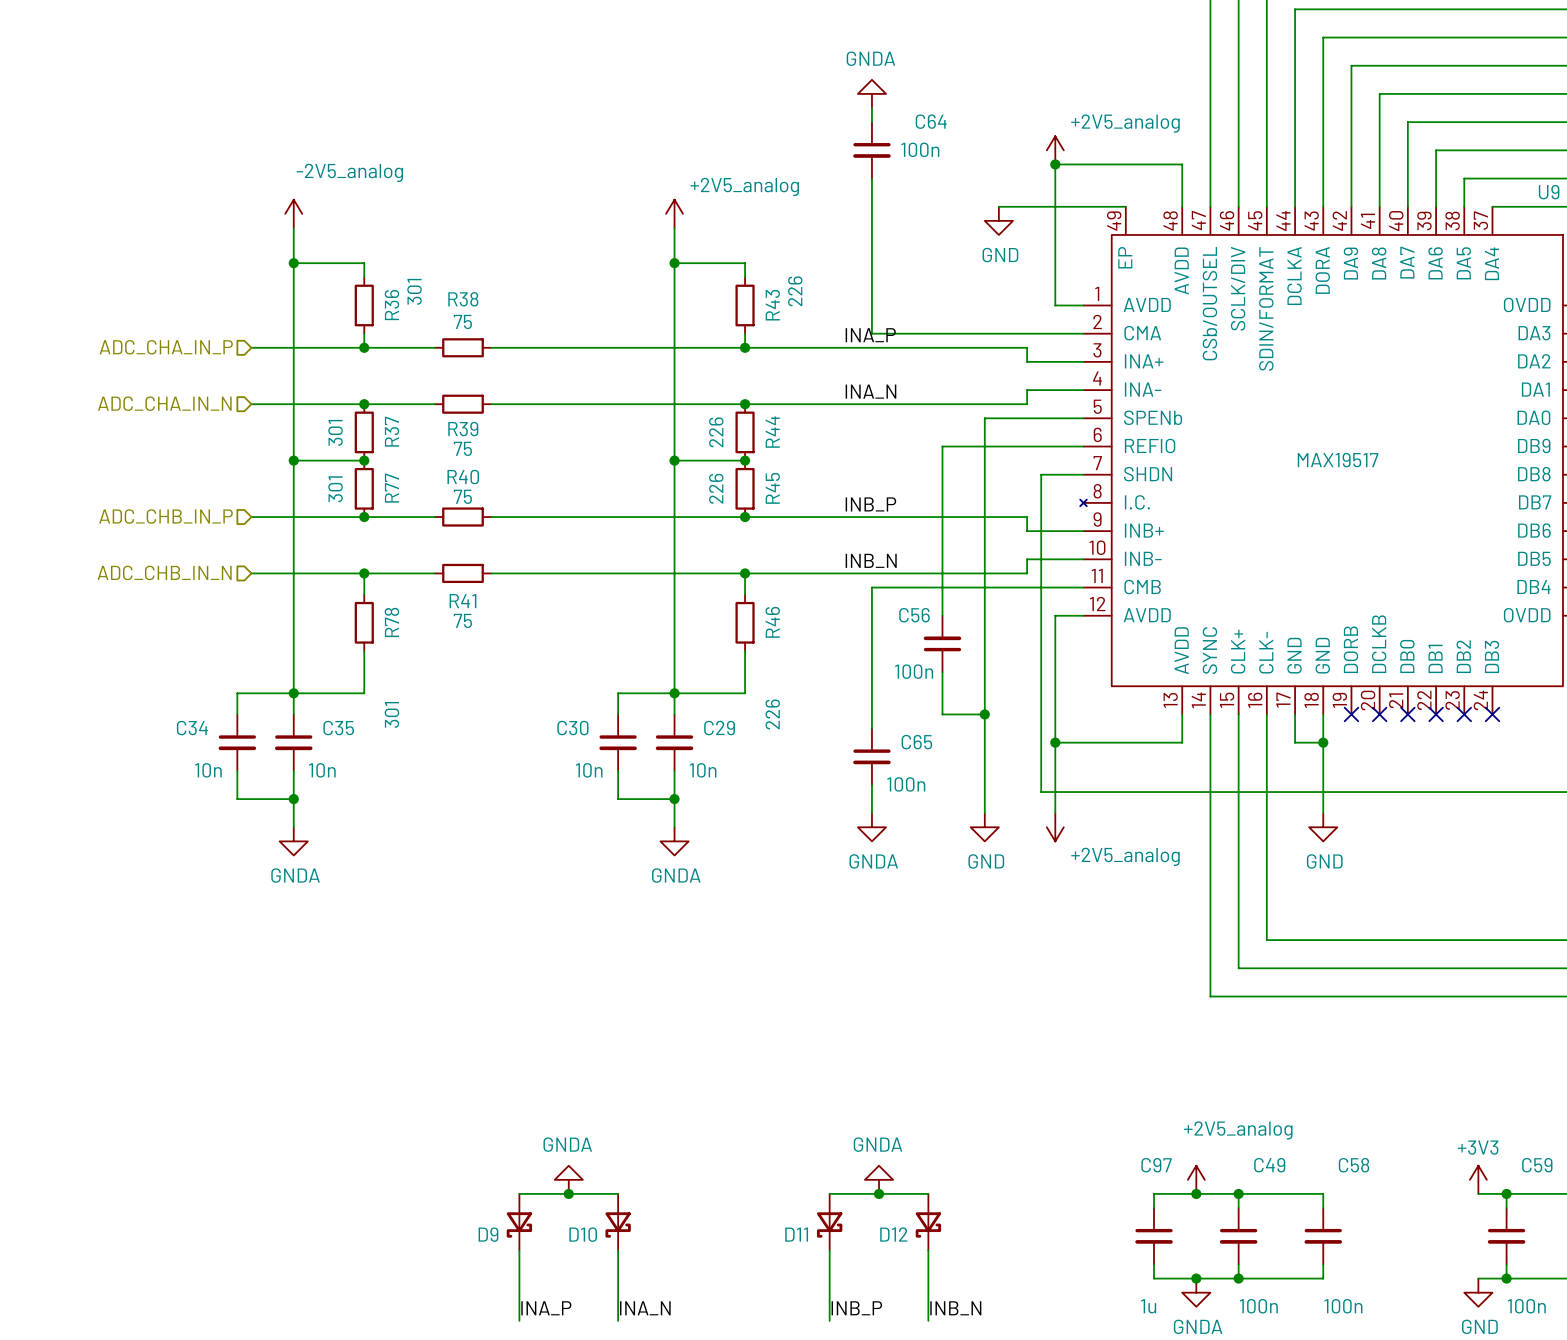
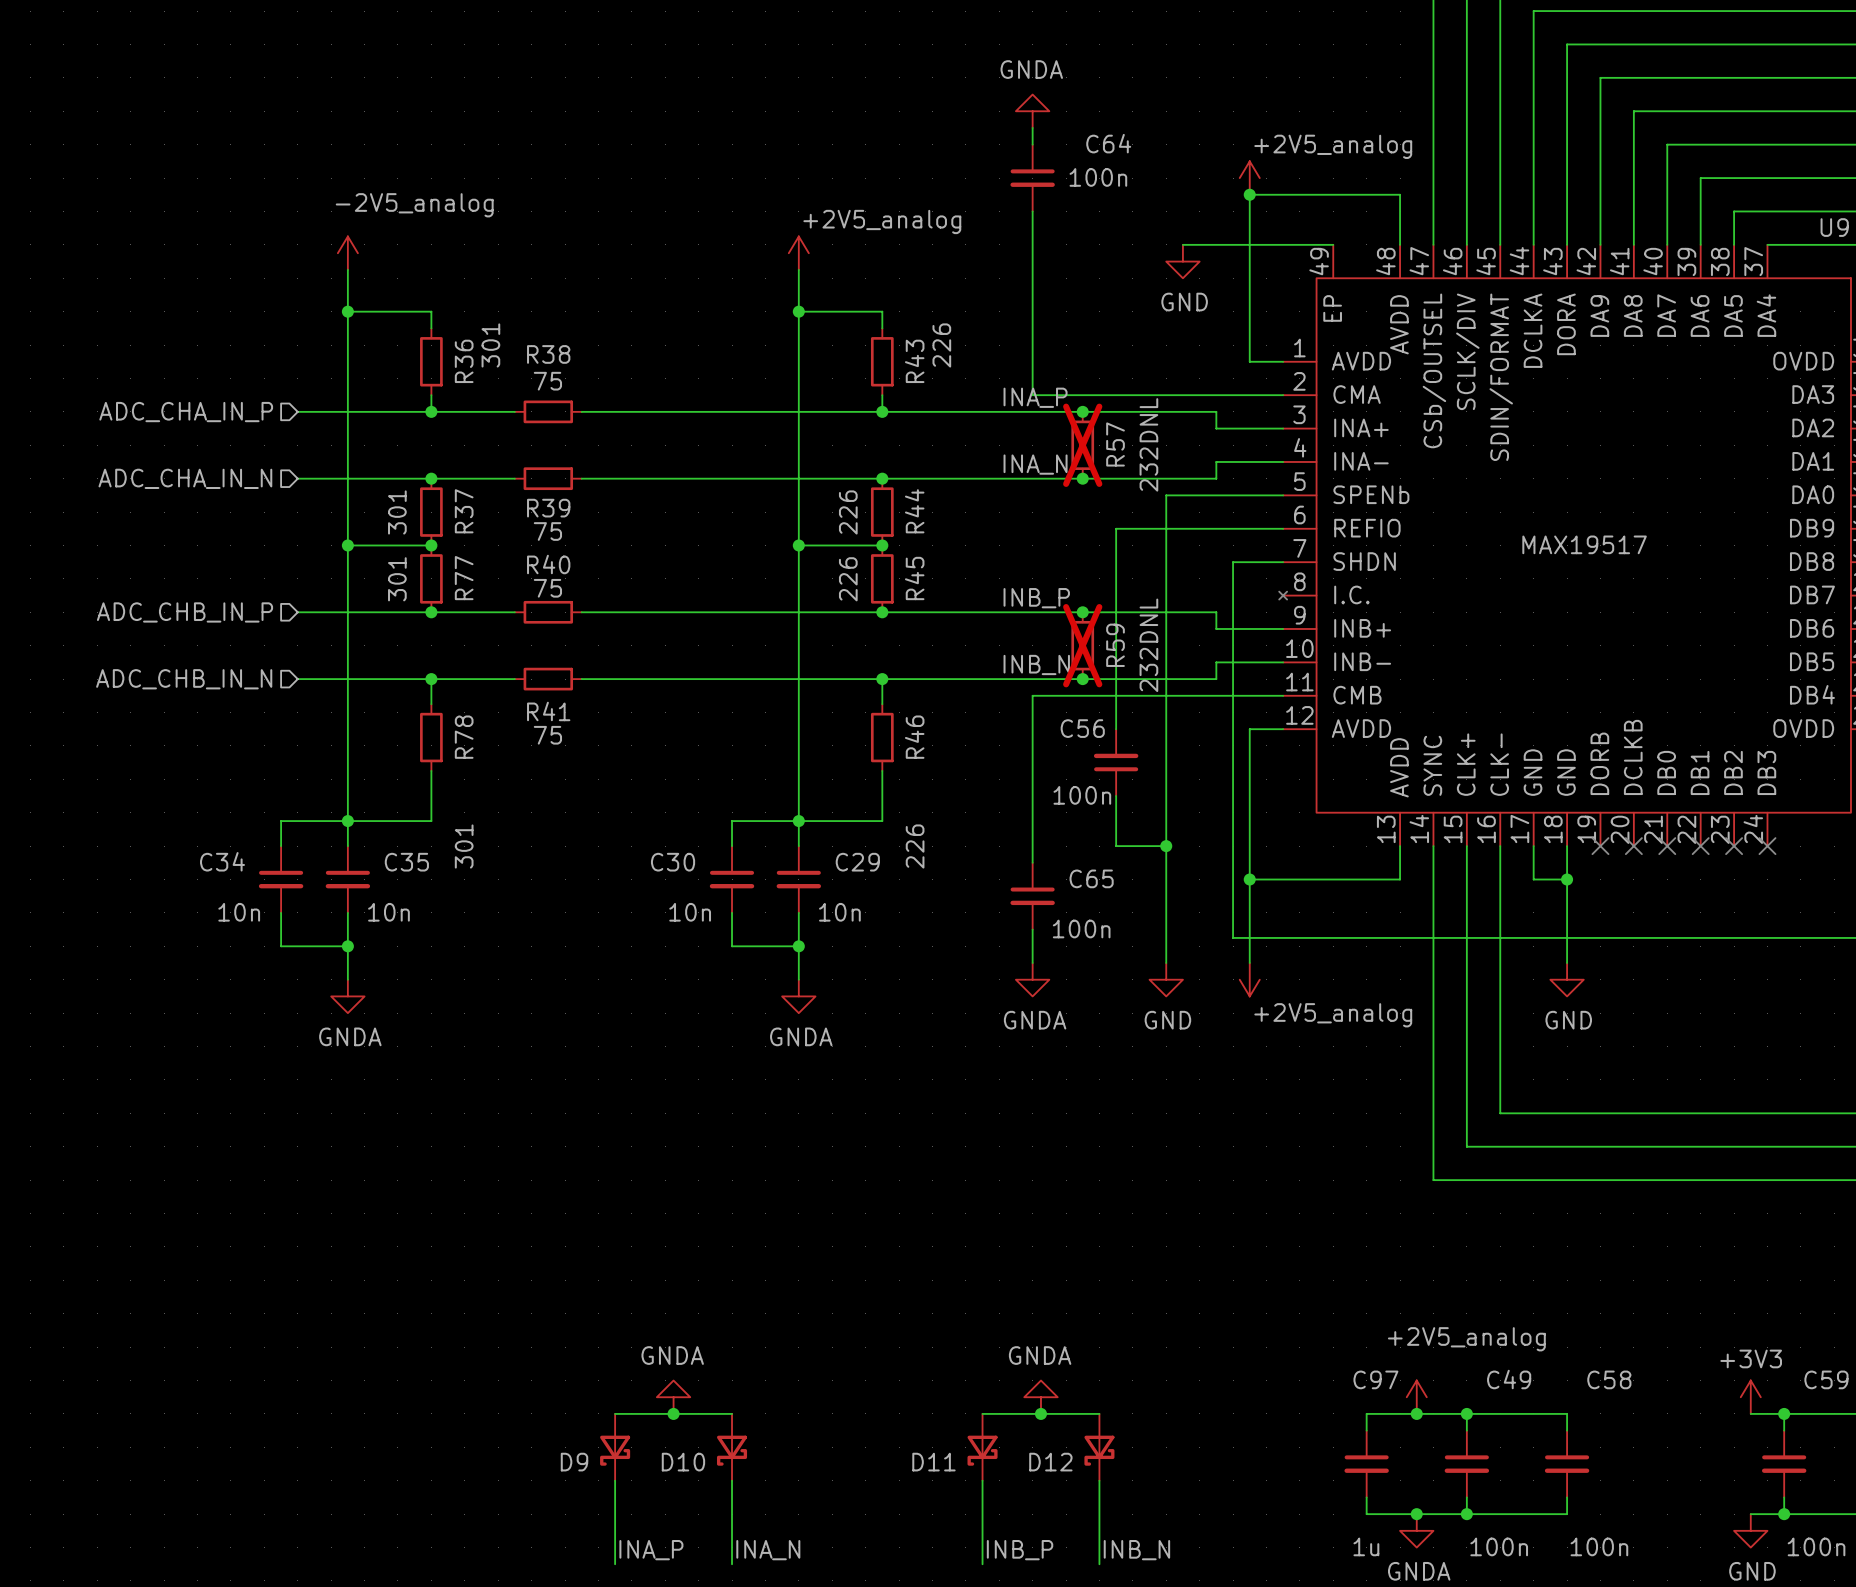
junction: none -> (1082, 411)
R57: none -> 232DNL (1082, 445)
junction: none -> (1082, 478)
junction: none -> (1082, 612)
R59: none -> 232DNL (1082, 645)
junction: none -> (1082, 679)

